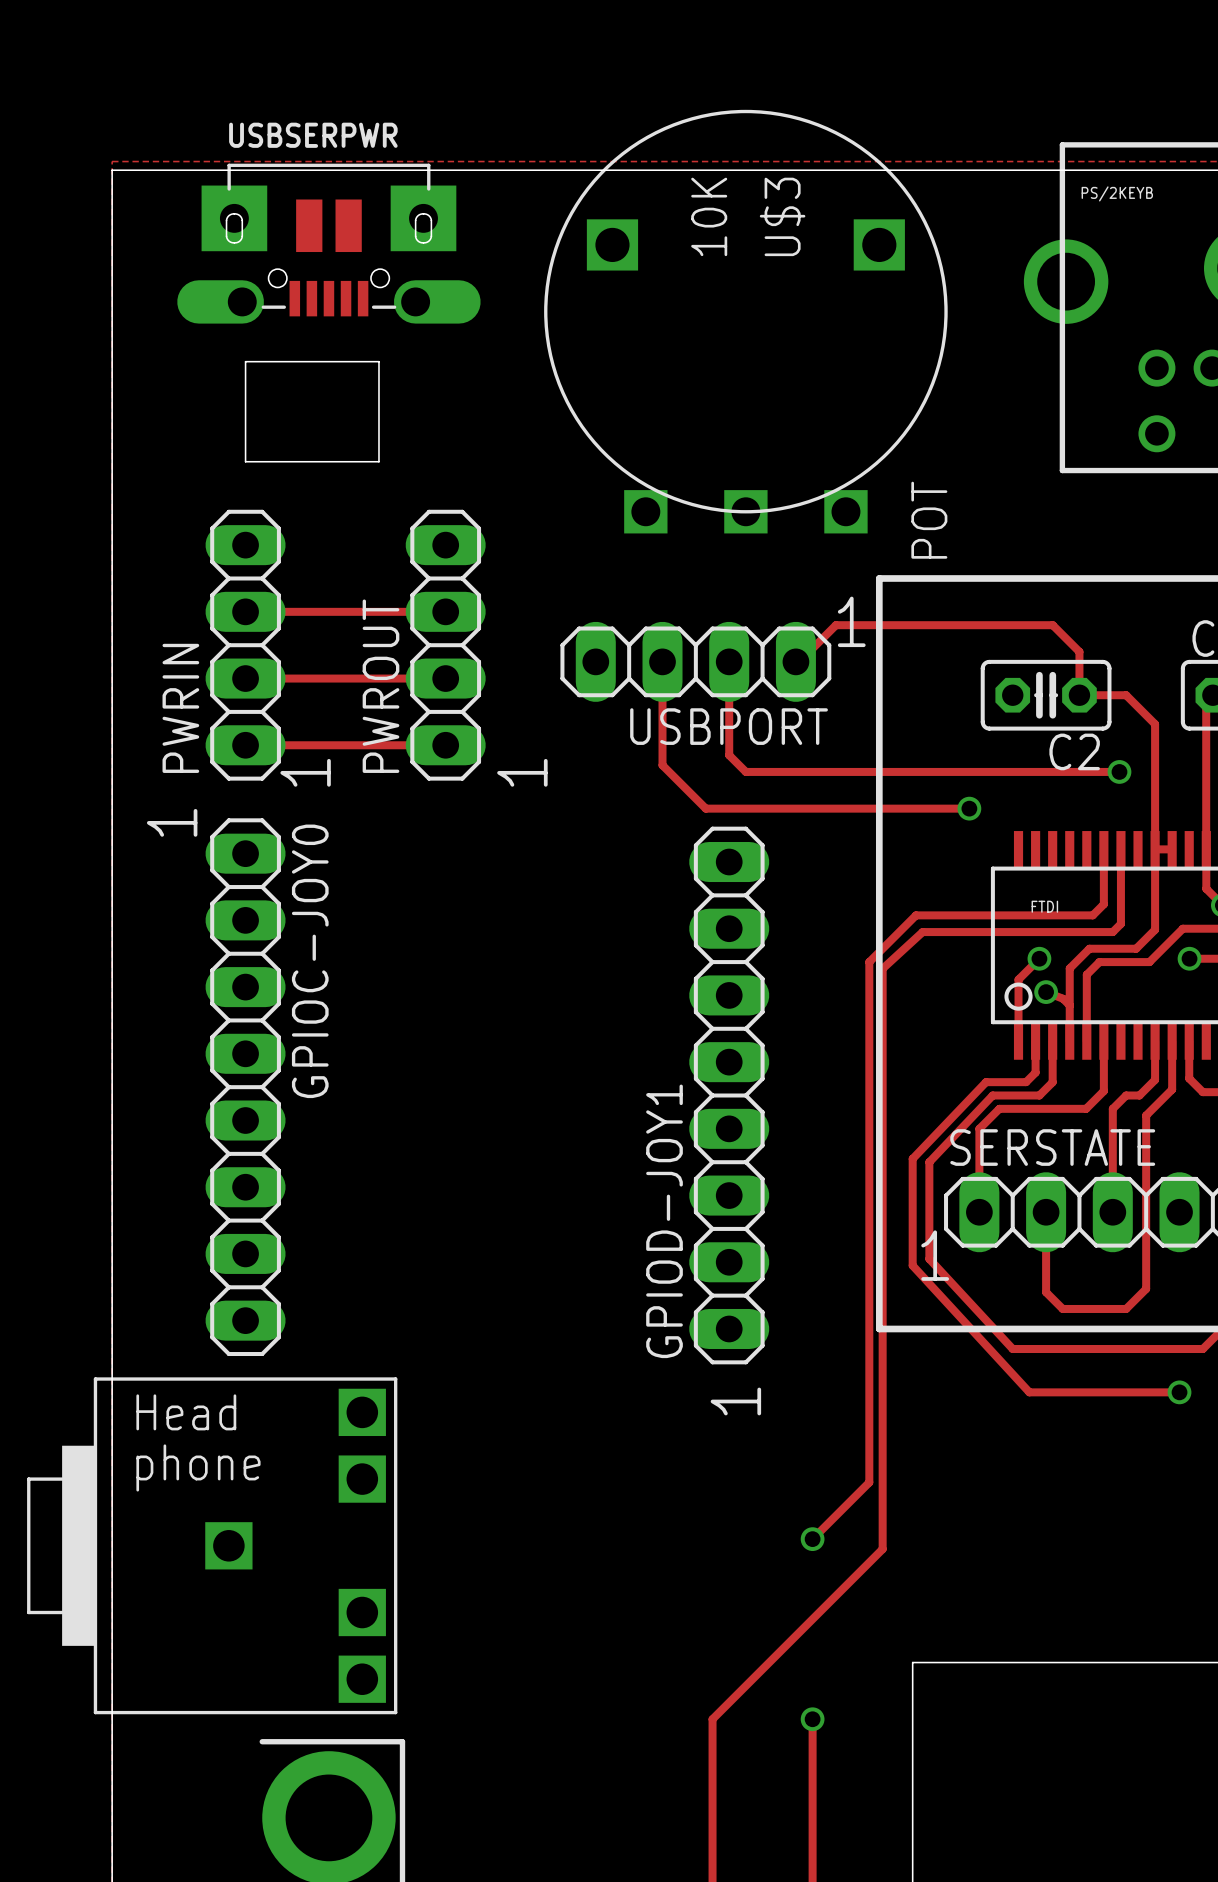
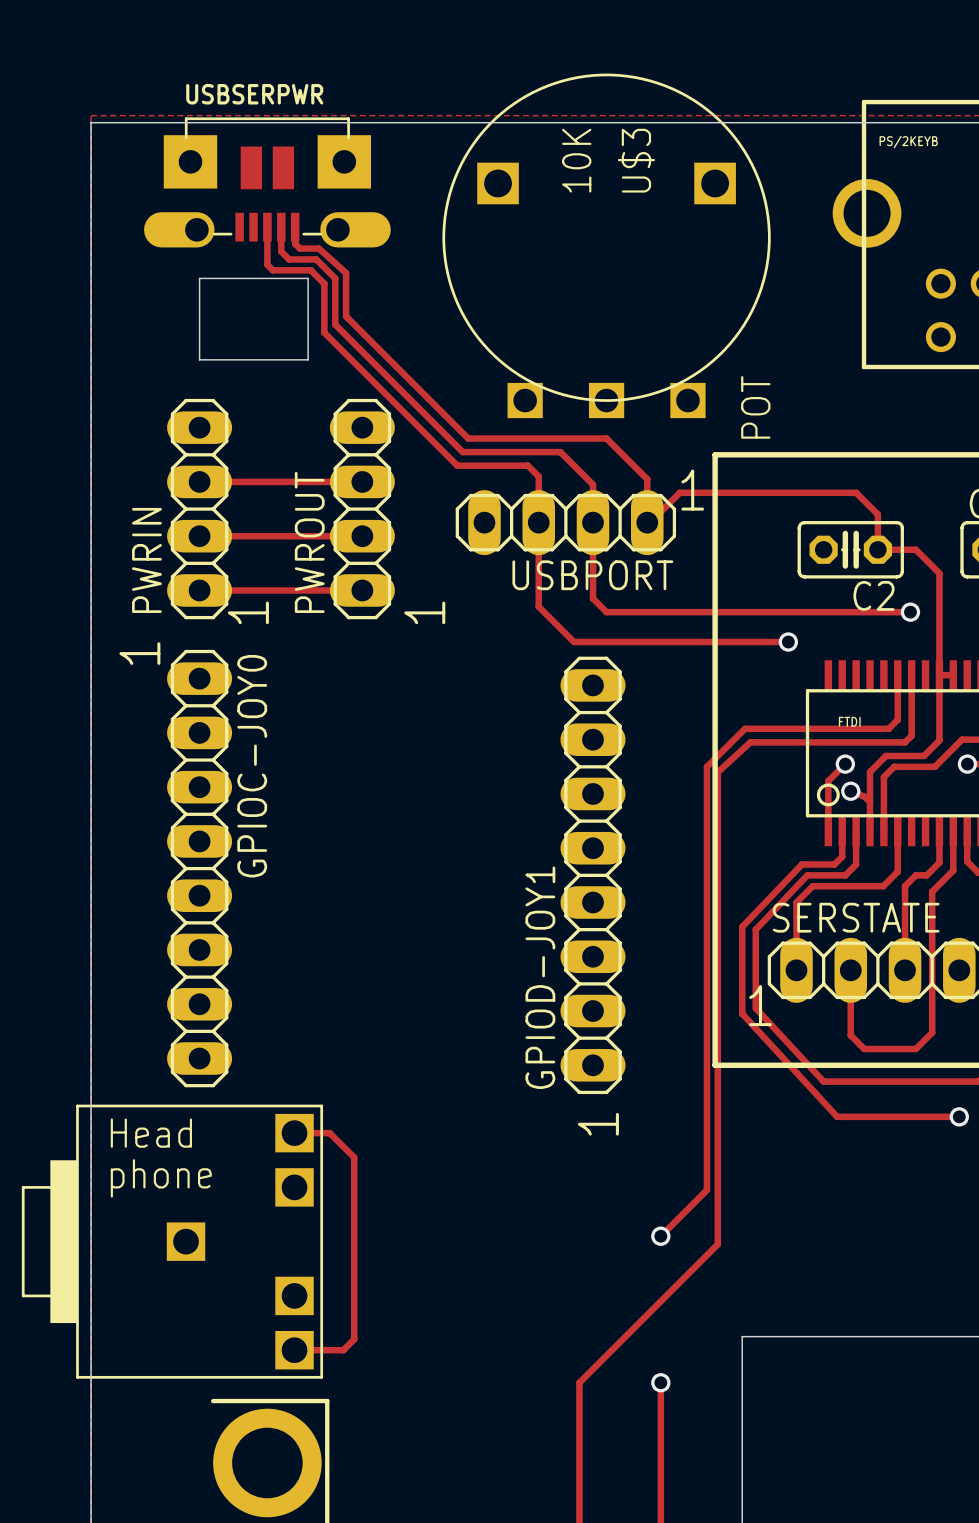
USBSERPWR footprint: [177, 163, 481, 324] -> [144, 117, 391, 248]
track: none -> (267, 227) (267, 264) (272, 270) (310, 270) (324, 283) (324, 332) (457, 465) (527, 465) (538, 476) (538, 522)
track: none -> (281, 227) (281, 251) (289, 259) (316, 259) (335, 278) (335, 324) (462, 452) (560, 452) (593, 484) (593, 522)
track: none -> (295, 227) (295, 243) (299, 248) (318, 248) (346, 273) (346, 316) (468, 438) (606, 438) (647, 479) (647, 522)
track: none -> (294, 1133) (329, 1133) (354, 1157) (354, 1339) (343, 1350) (294, 1350)

